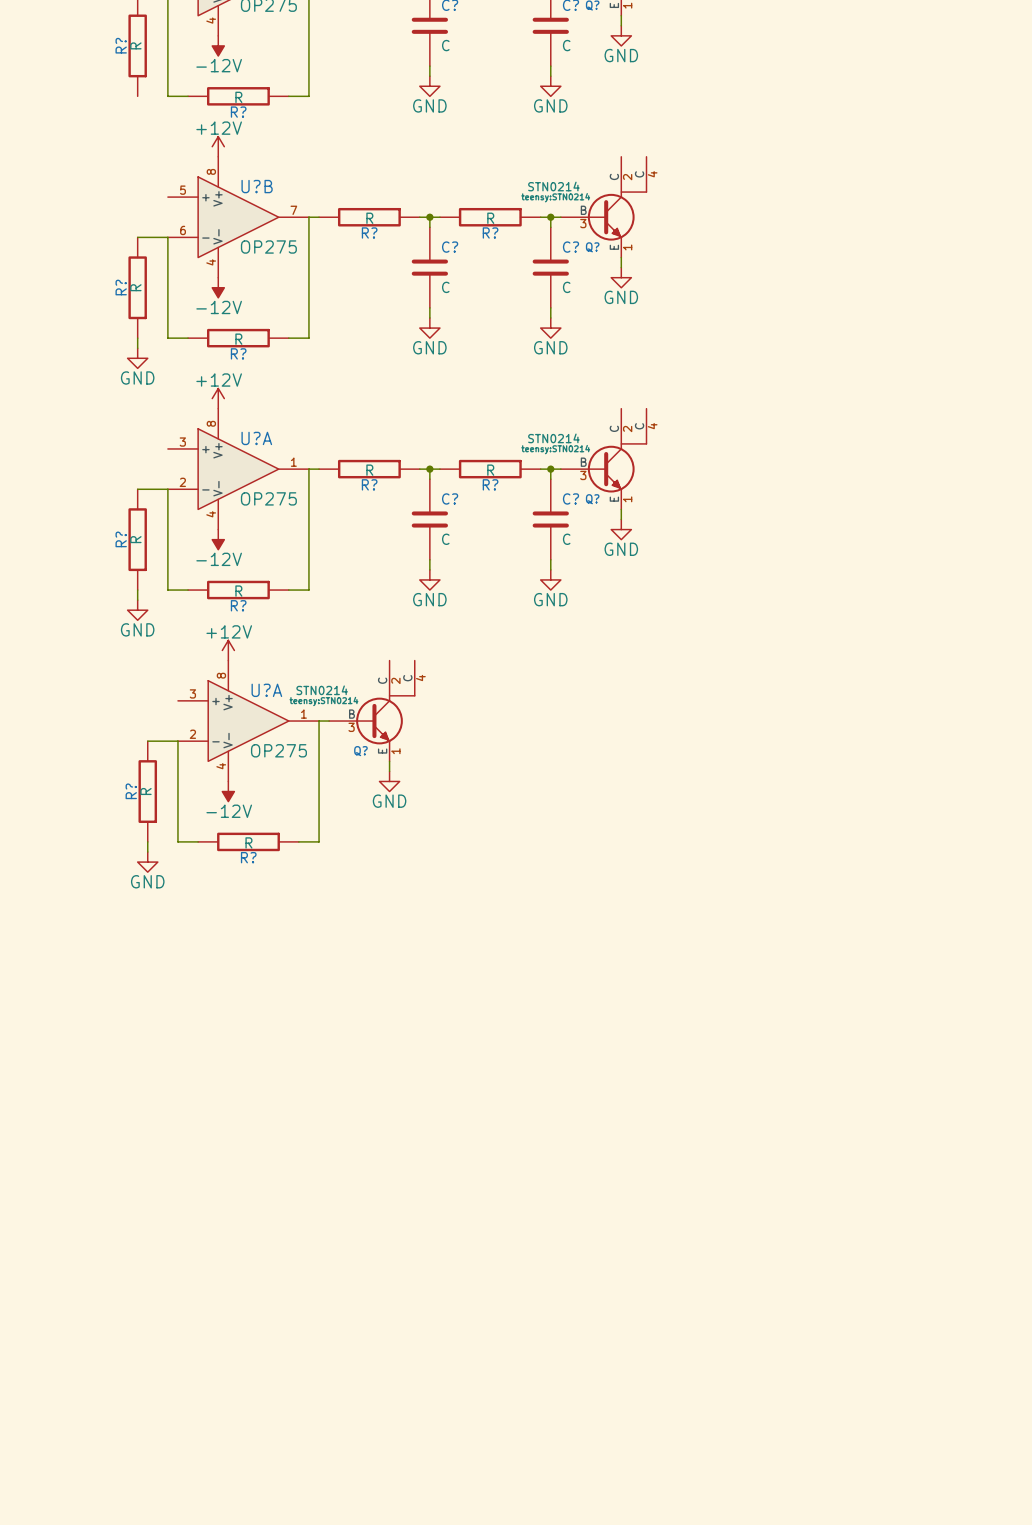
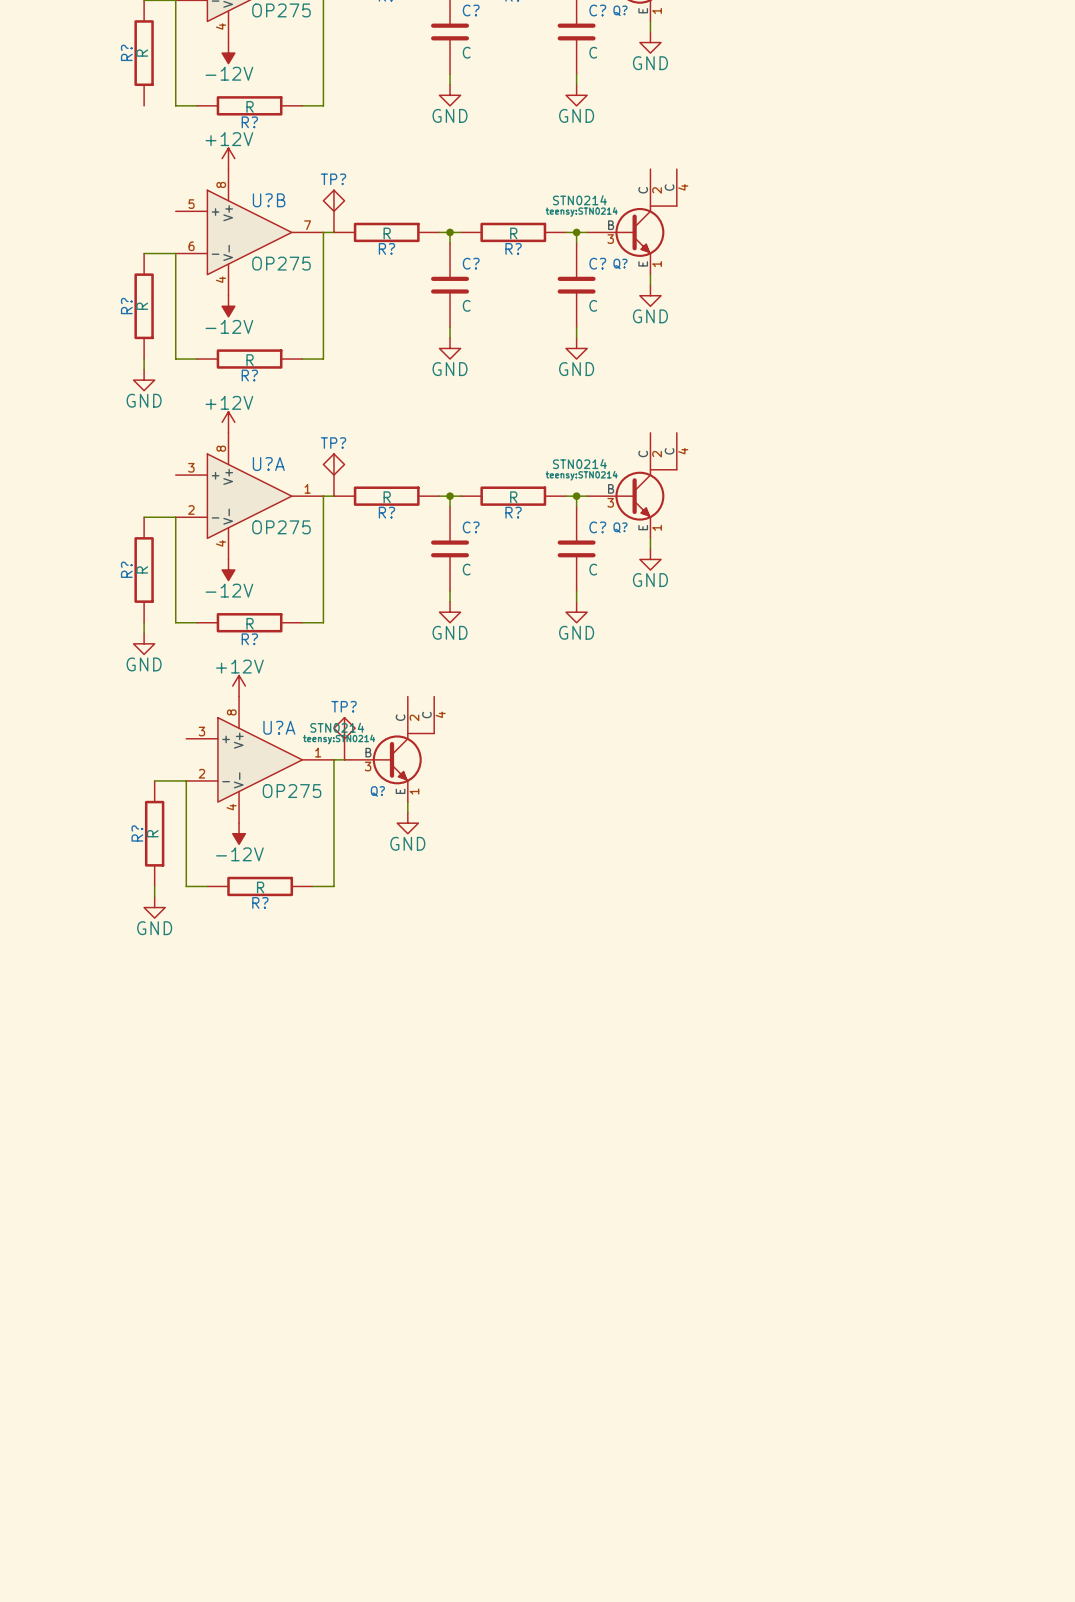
TP?: none -> (333, 211)
TP?: none -> (333, 475)
TP?: none -> (344, 738)

